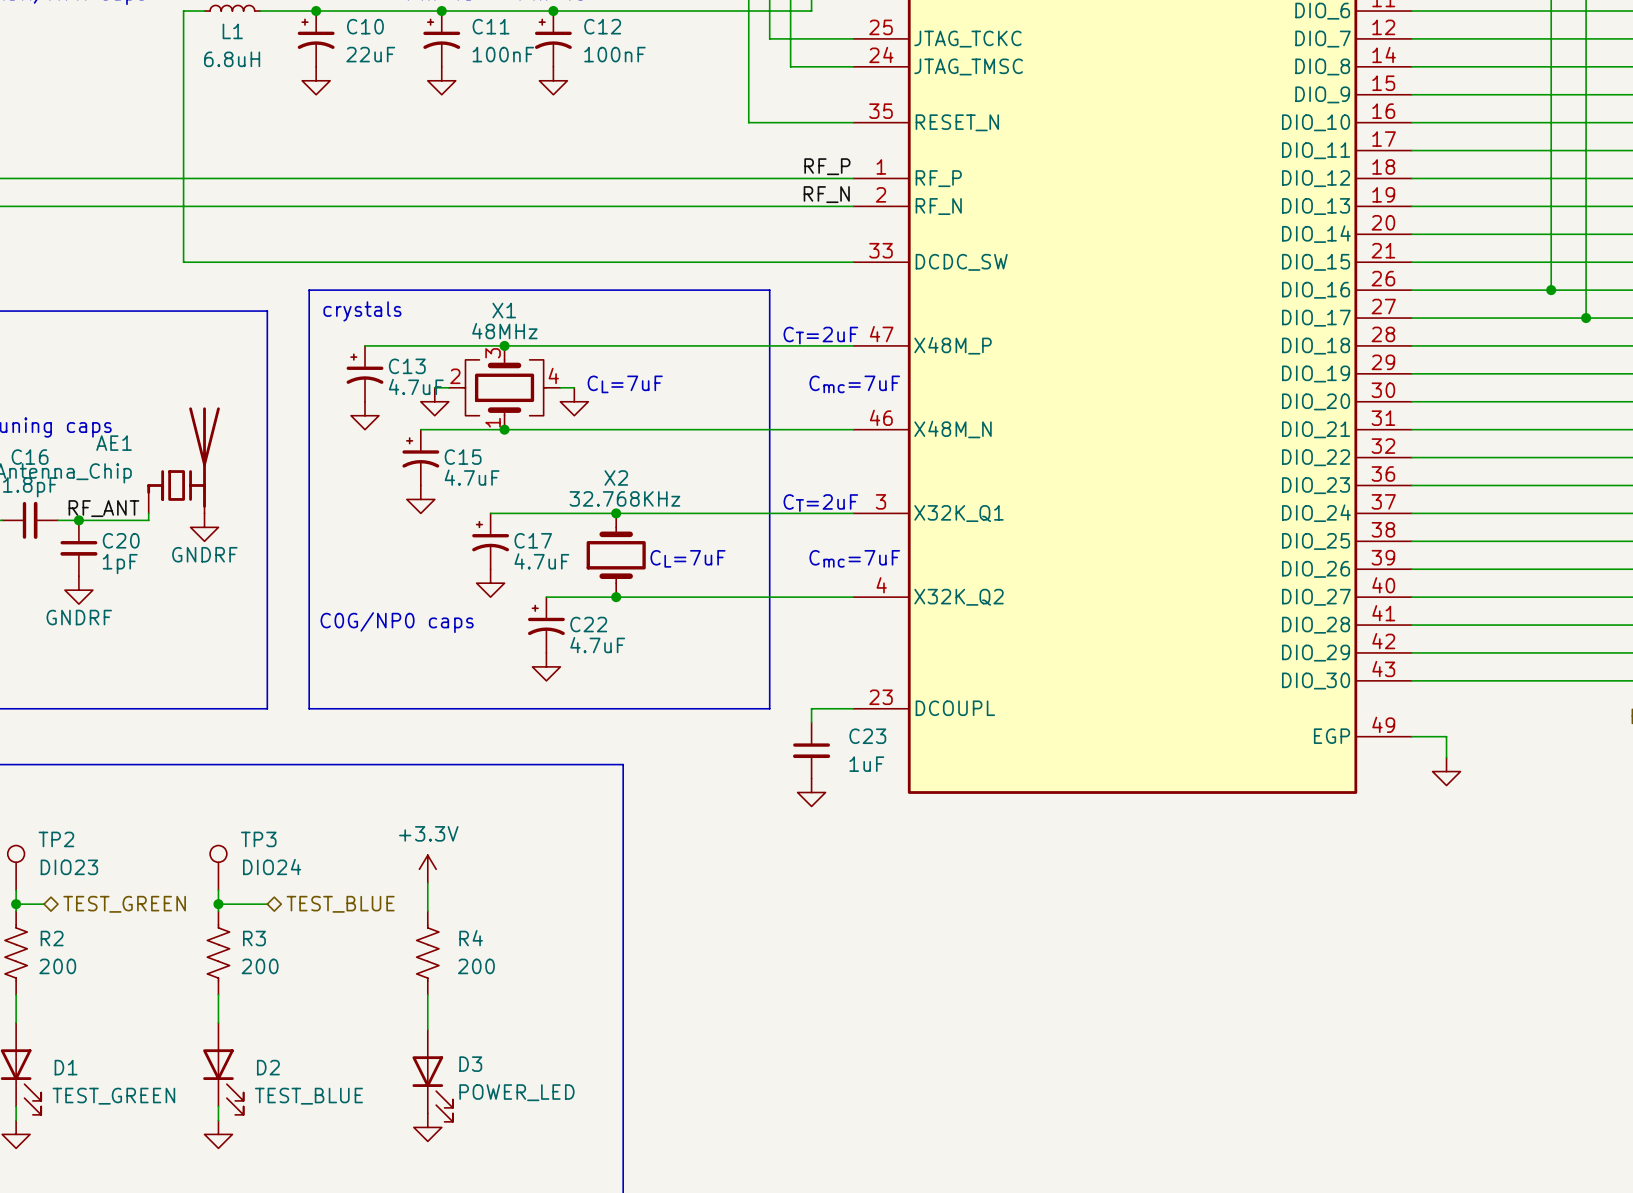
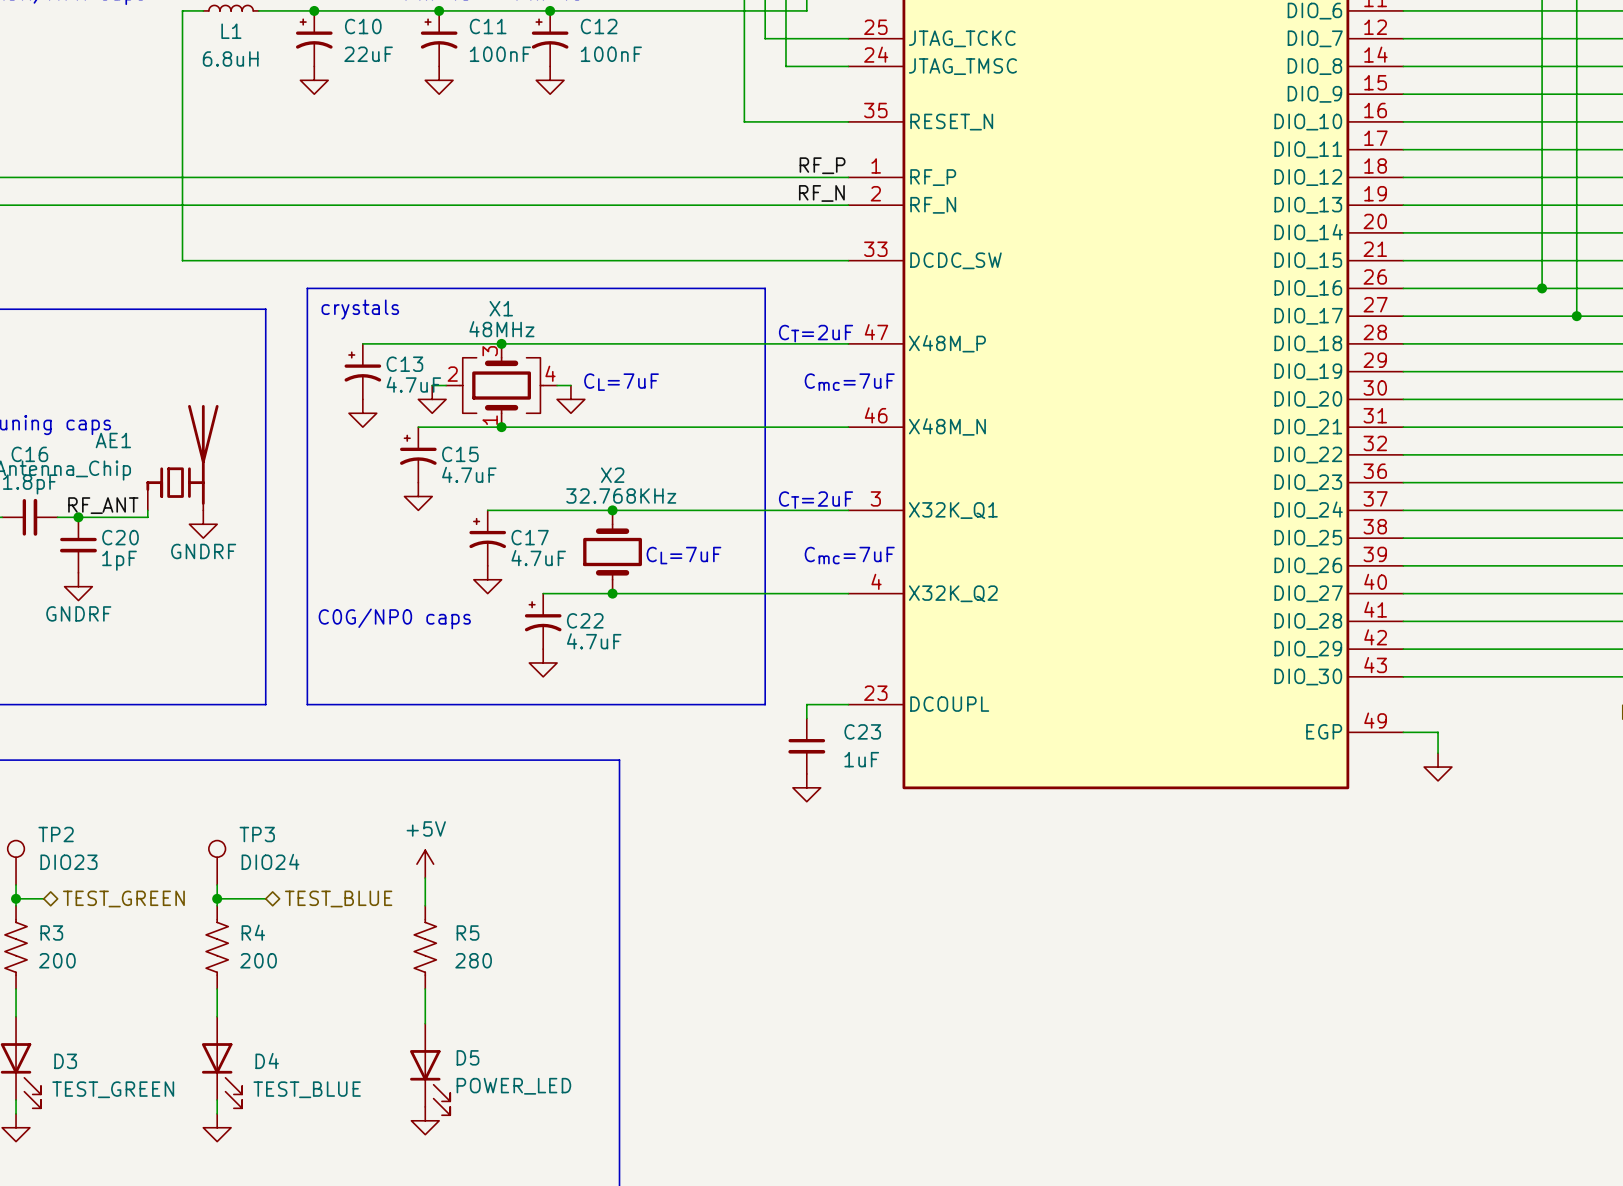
power symbol: +3.3V (427, 869) -> +5V (425, 864)
R2 name: R2 (52, 938) -> R3 (51, 933)
R3 name: R3 (254, 938) -> R4 (253, 932)
R4 name: R4 (471, 938) -> R5 (468, 933)
R4 value: 200 (476, 966) -> 280 (473, 960)
D3 name: D3 (470, 1064) -> D5 (468, 1057)
D1 name: D1 (66, 1067) -> D3 (65, 1061)
D2 name: D2 (268, 1067) -> D4 (267, 1060)

